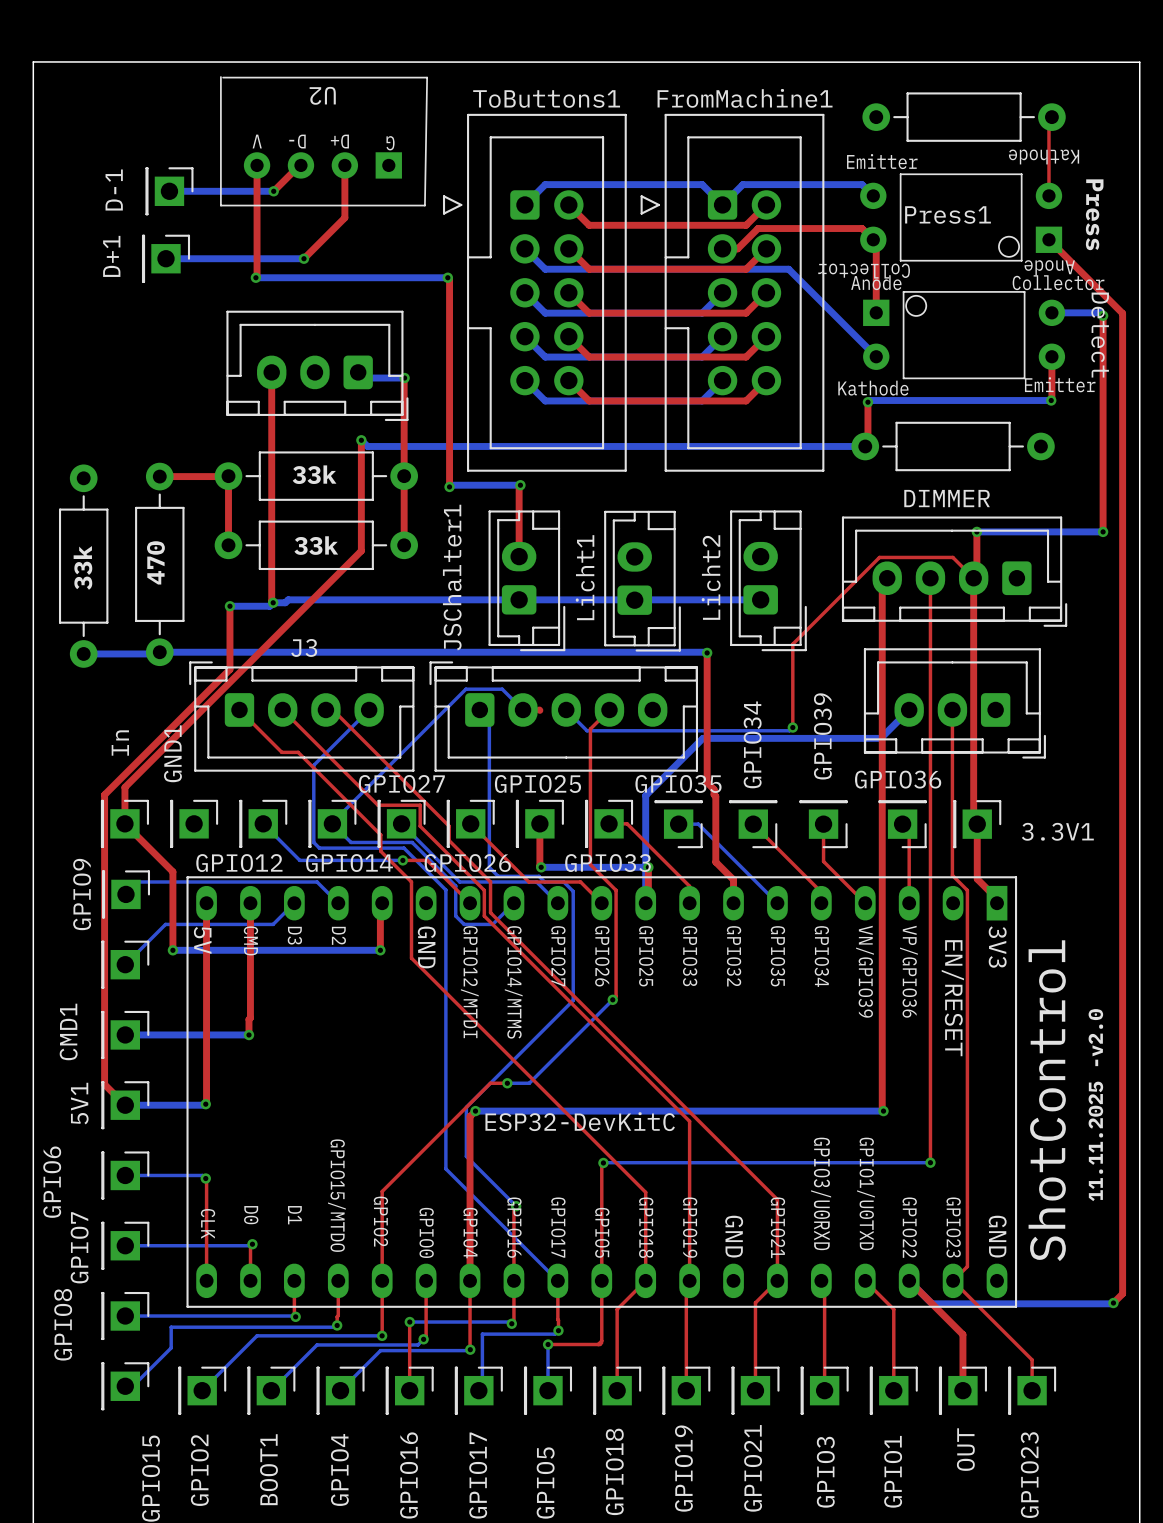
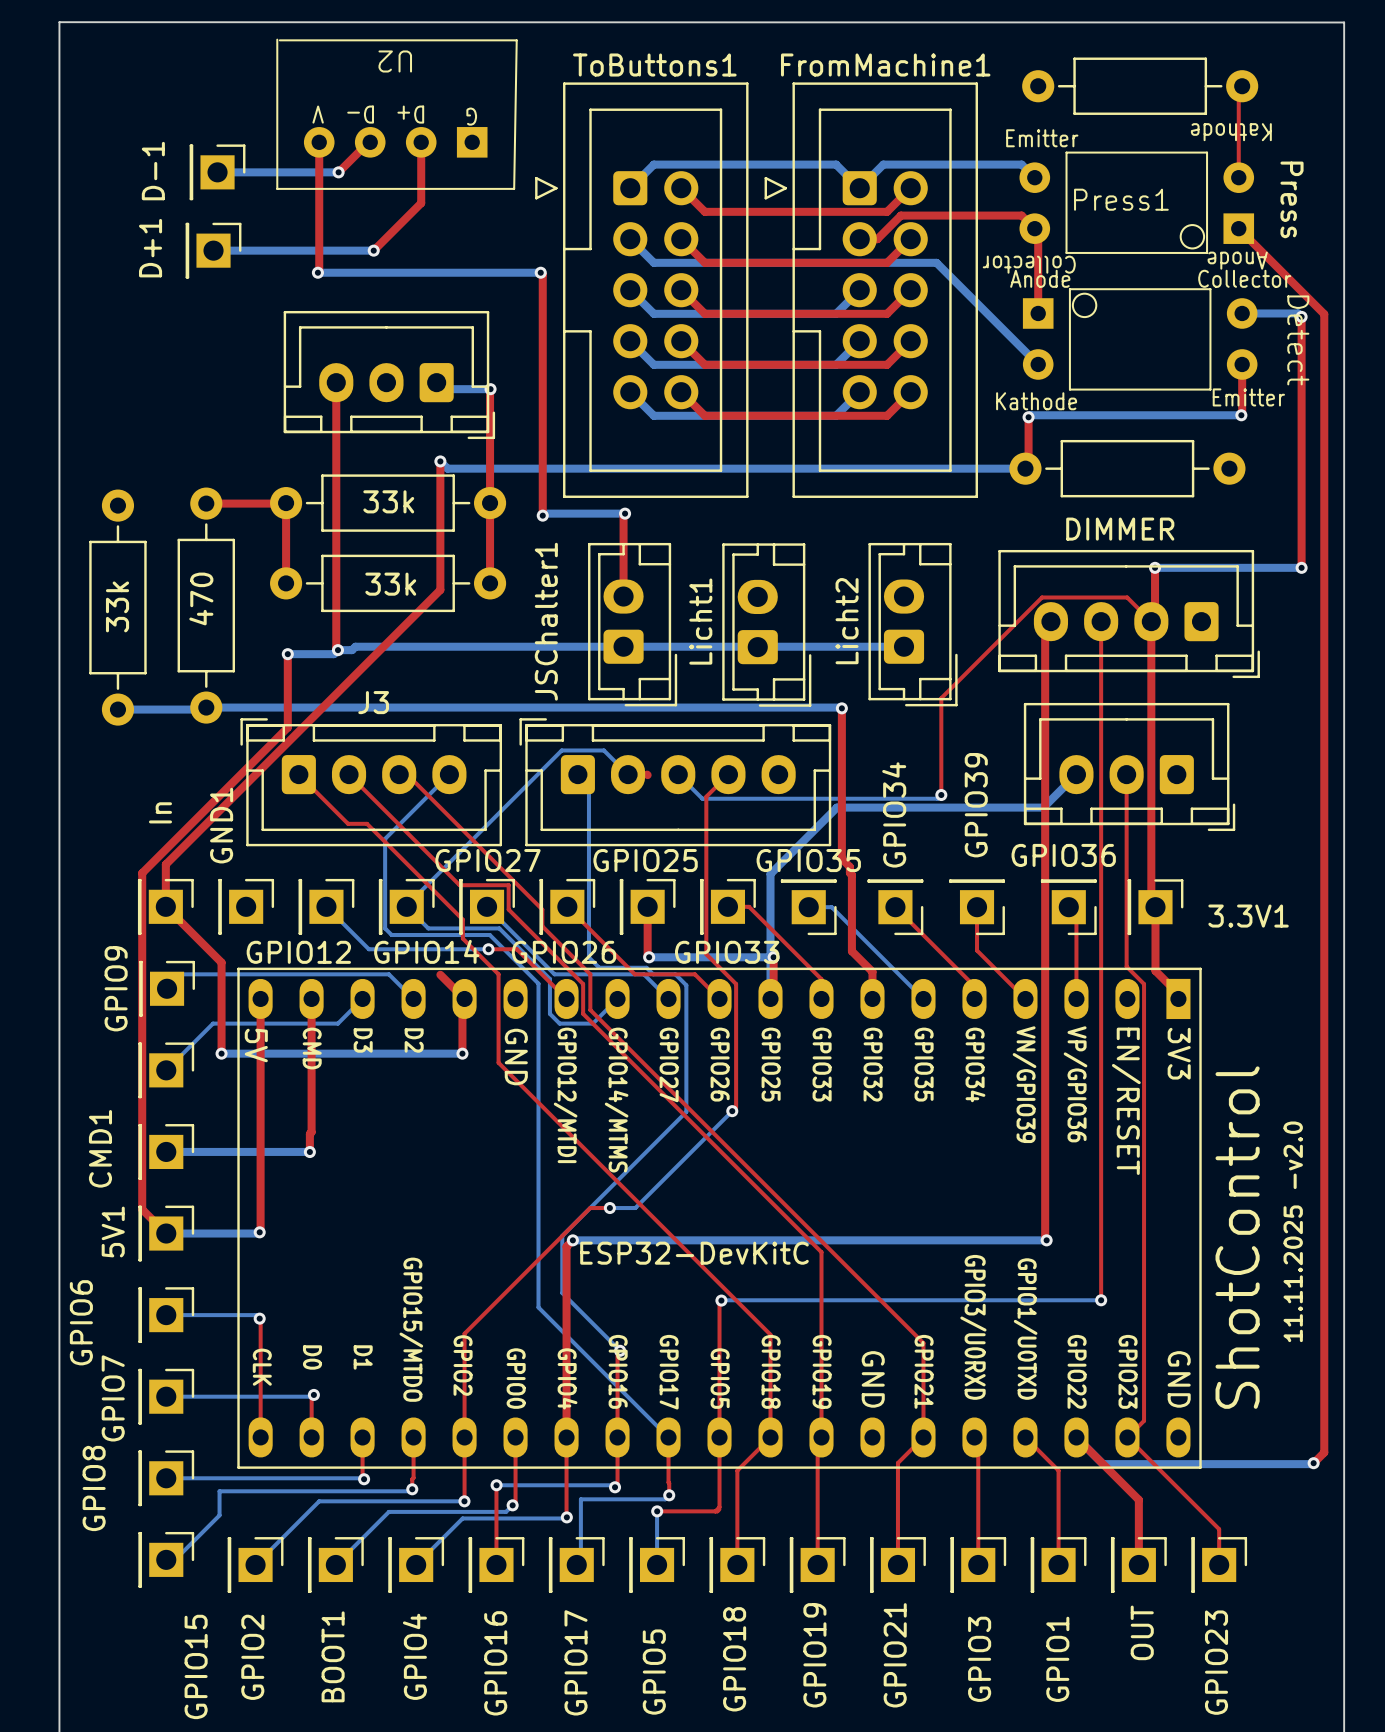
top track: none -> (440, 974) (464, 998)

